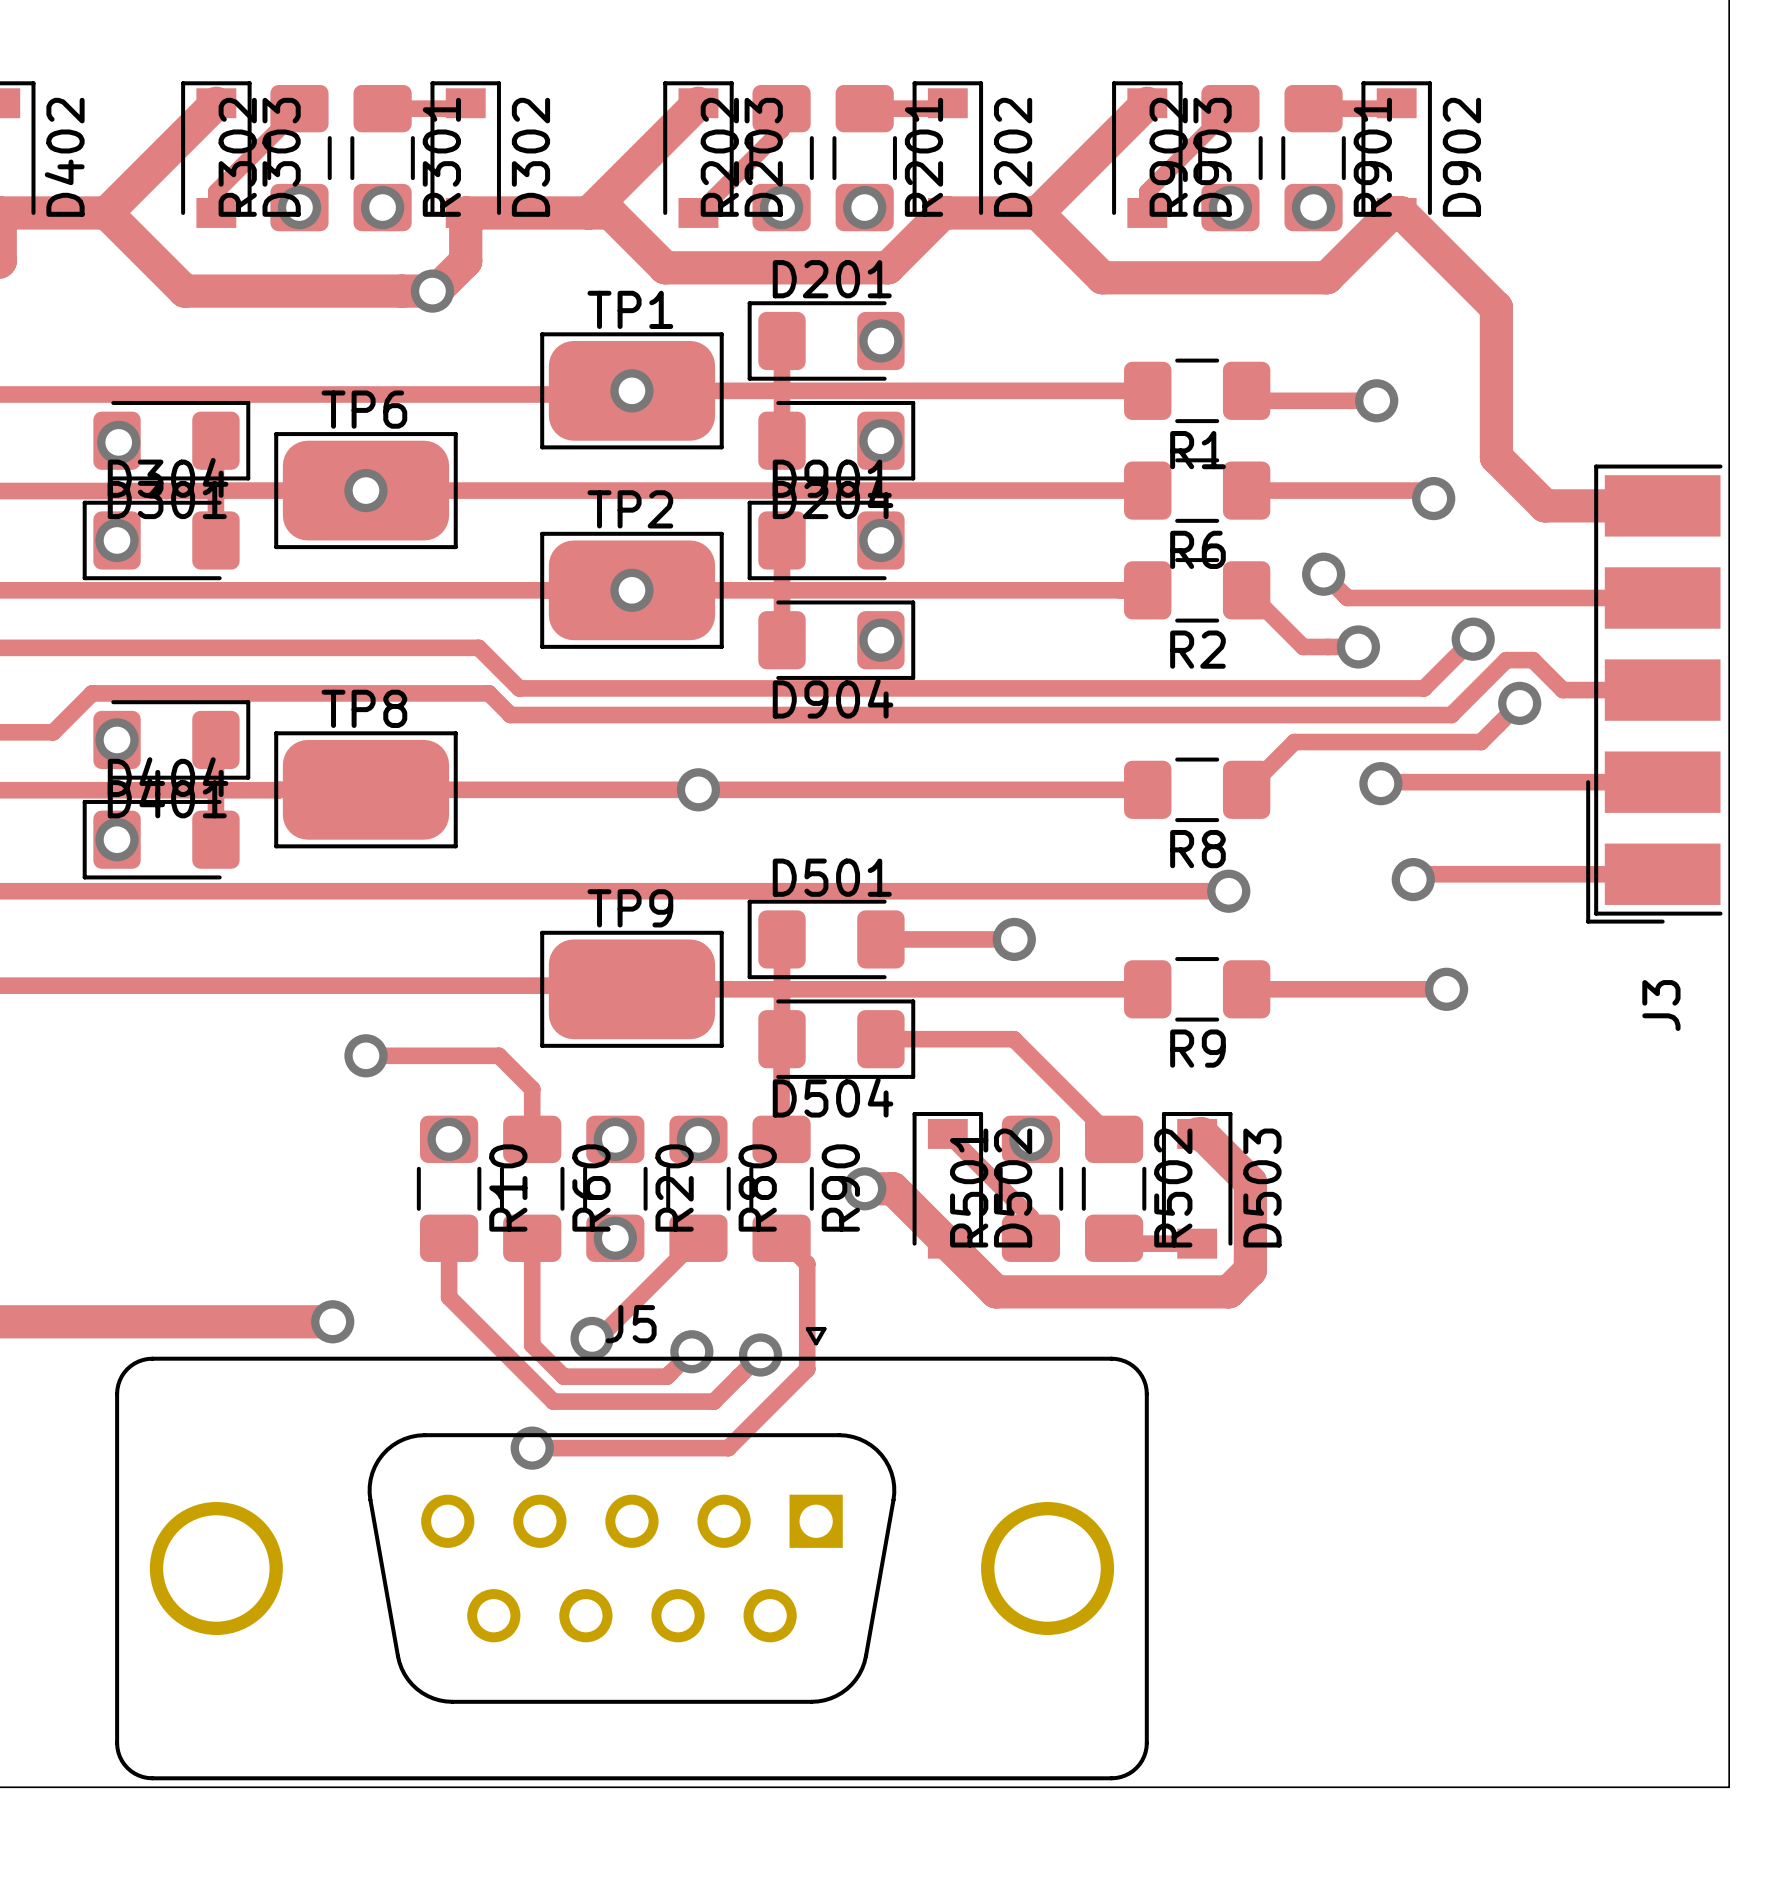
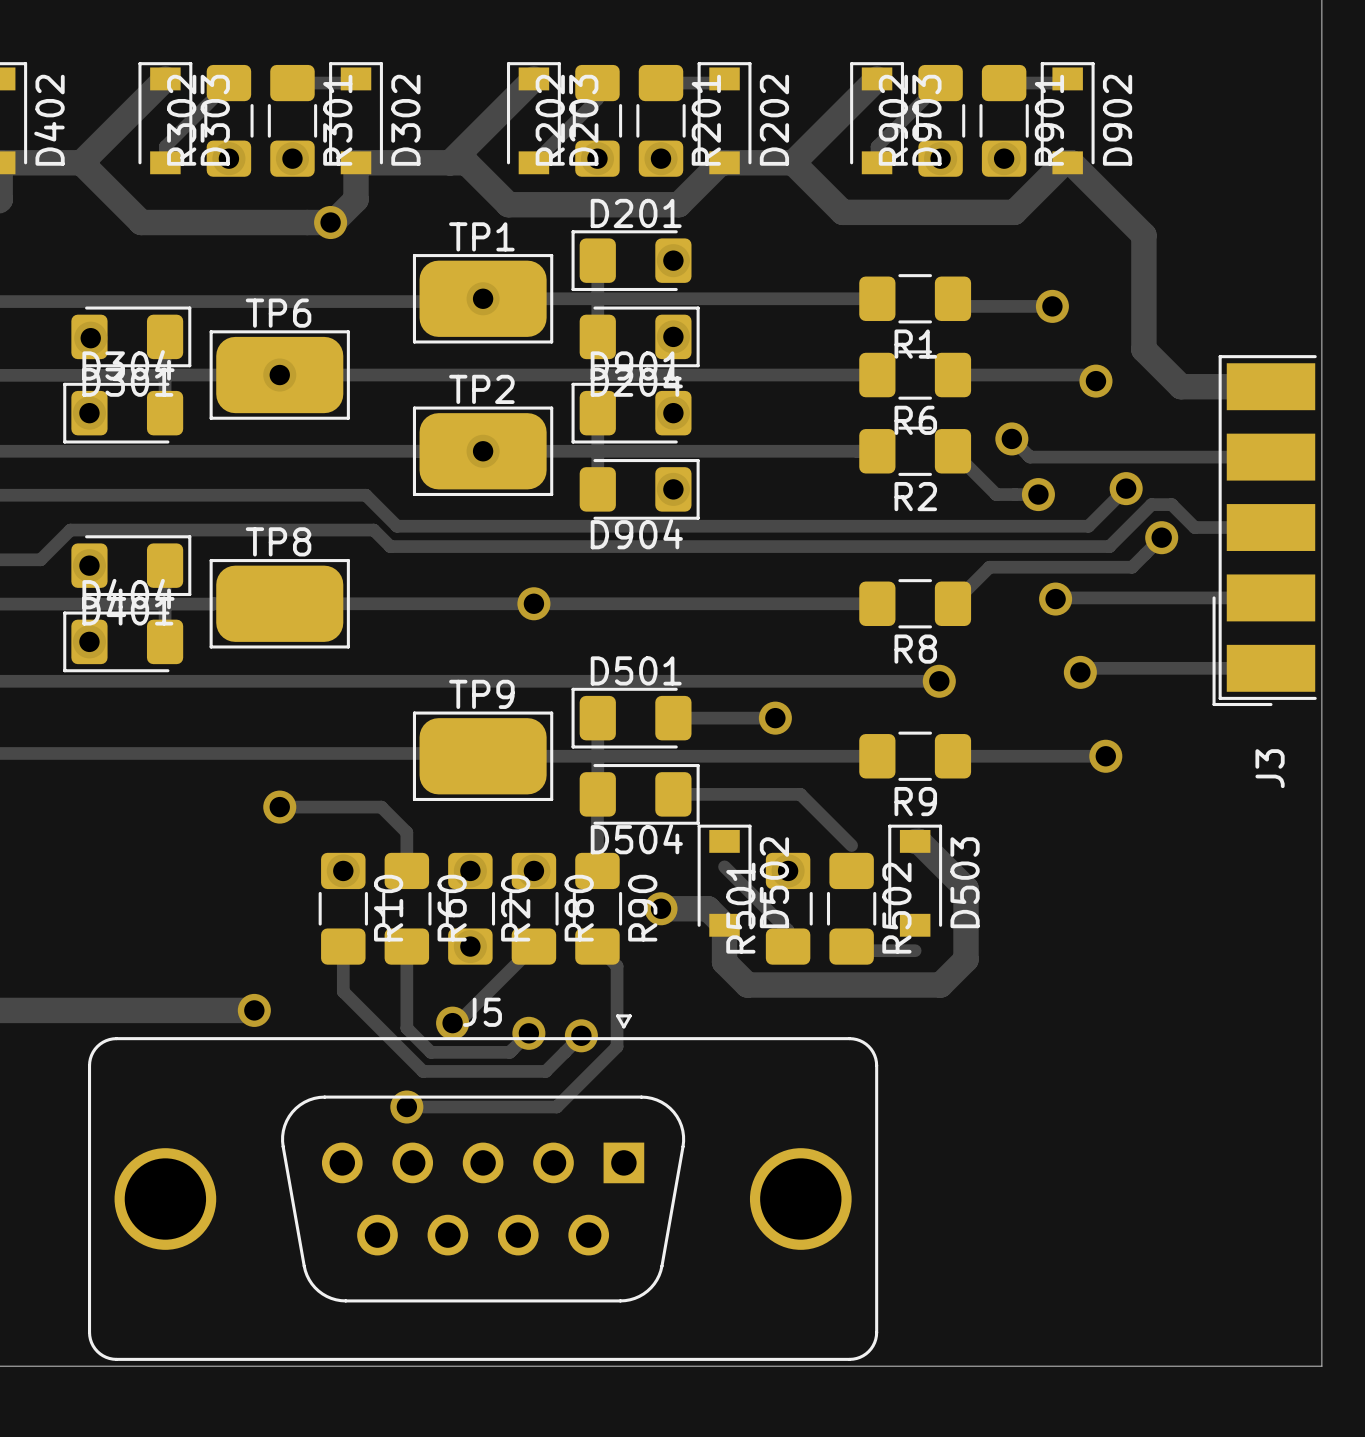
track: (1013, 1039) (1114, 1139) -> (775, 794) (800, 794) (851, 845)
track: (1197, 1133) (1202, 1133) (1250, 1182) (1250, 1270) (1228, 1291) (996, 1291) (892, 1188) -> (915, 841) (918, 841) (966, 888) (966, 959) (940, 985) (747, 985) (724, 962) (724, 925) (708, 908) (682, 908)
D502 position: (947, 1185) -> (724, 880)
D503 position: (1197, 1185) -> (915, 880)

